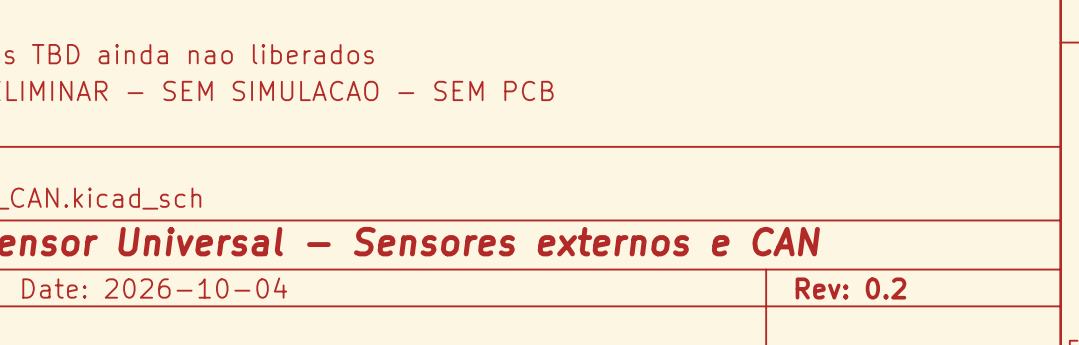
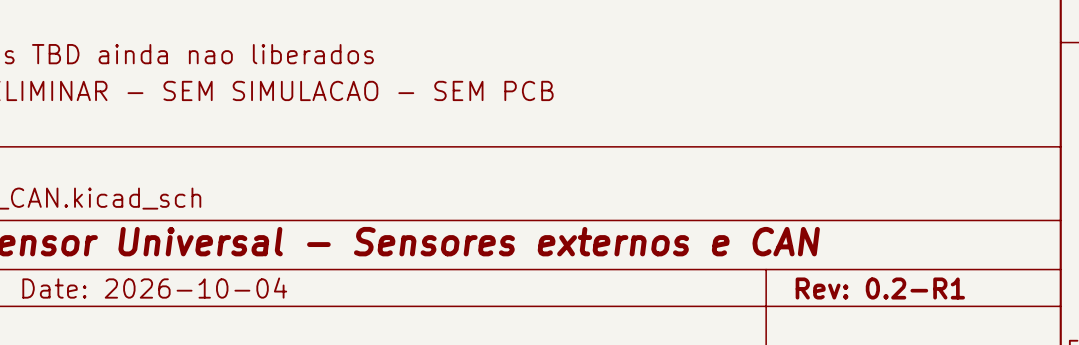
title block: Rev: 0.2 (850, 288) -> Rev: 0.2-R1 (880, 288)

